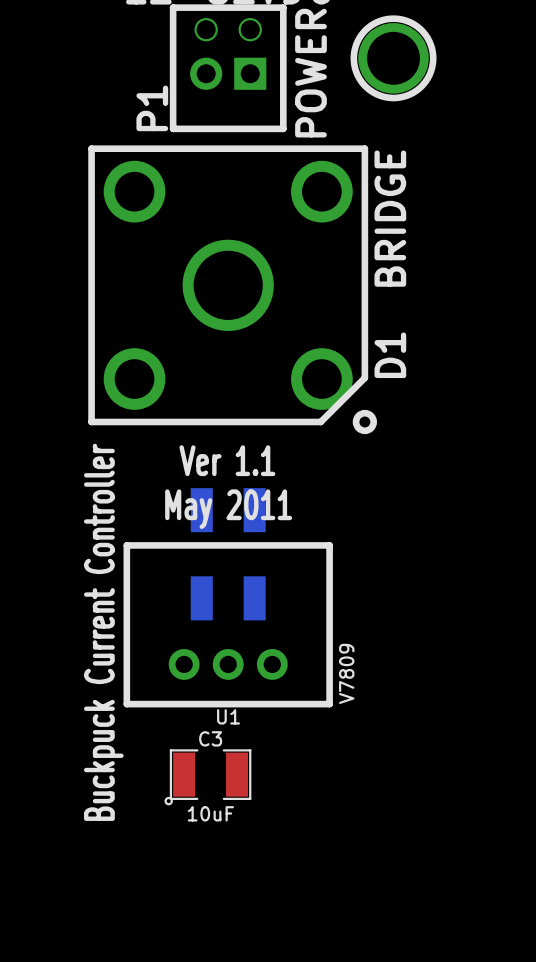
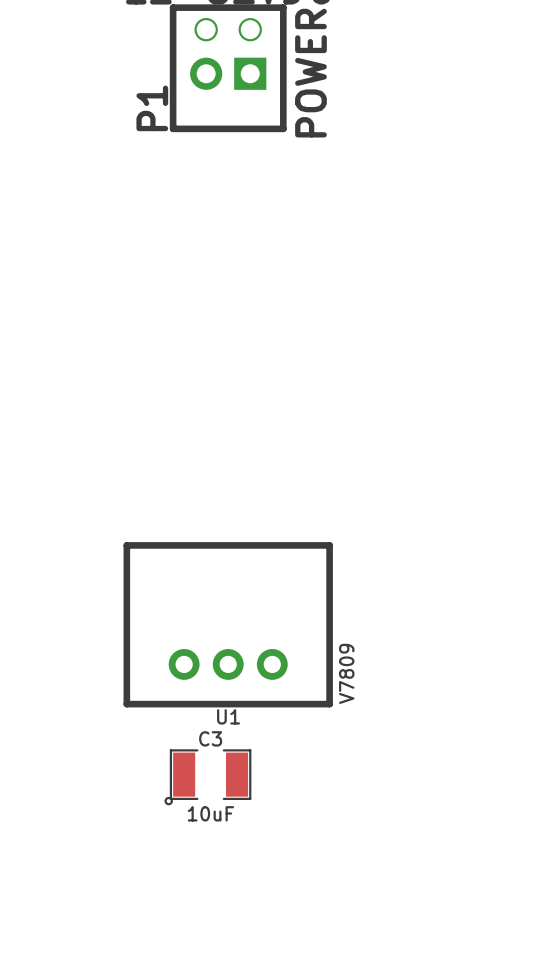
part: (393, 58) -> none
D1: BRIDGE (232, 289) -> none
text: Ver 1.1 (227, 460) -> none
text: May 2011 (228, 509) -> none
part: (228, 510) -> none
part: (228, 598) -> none
text: Buckpuck Current Controller (103, 632) -> none

